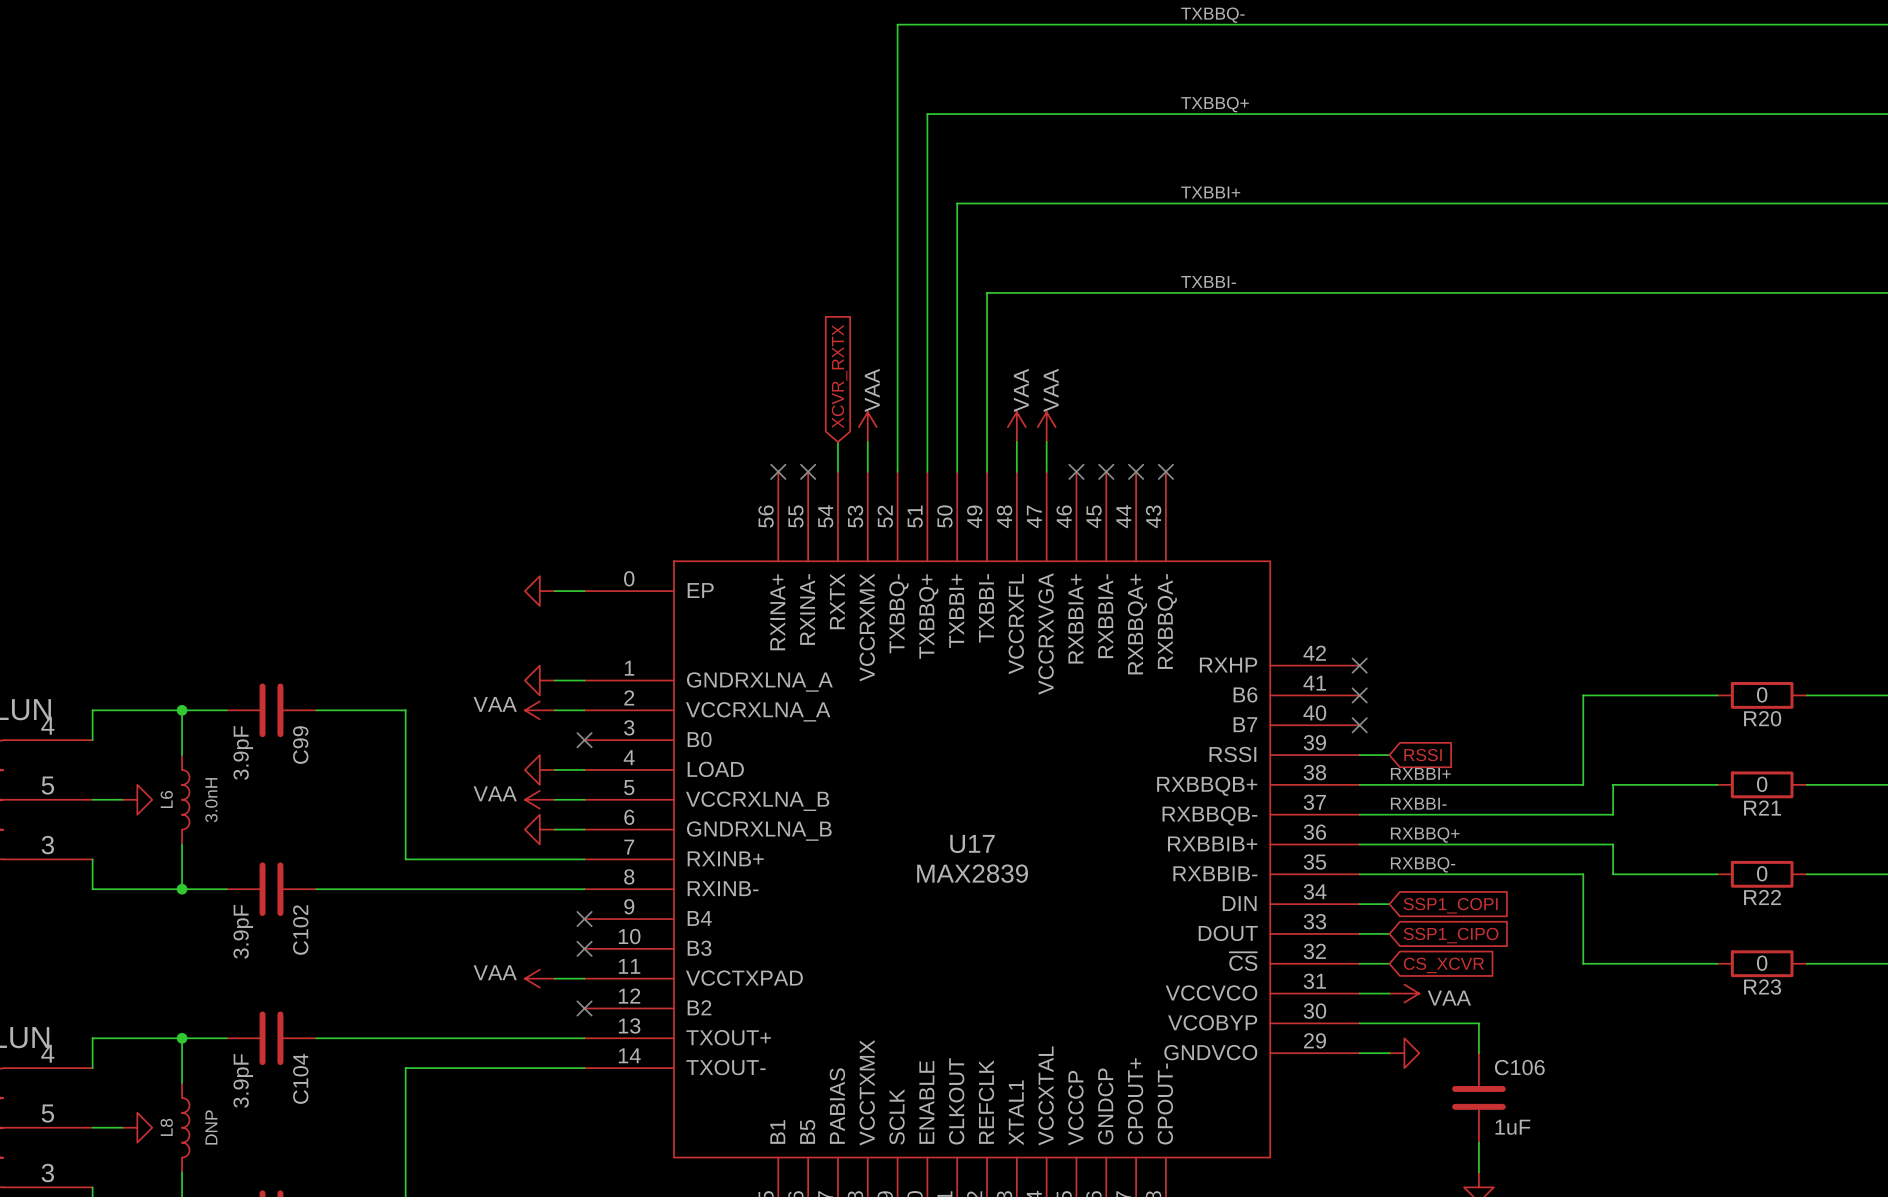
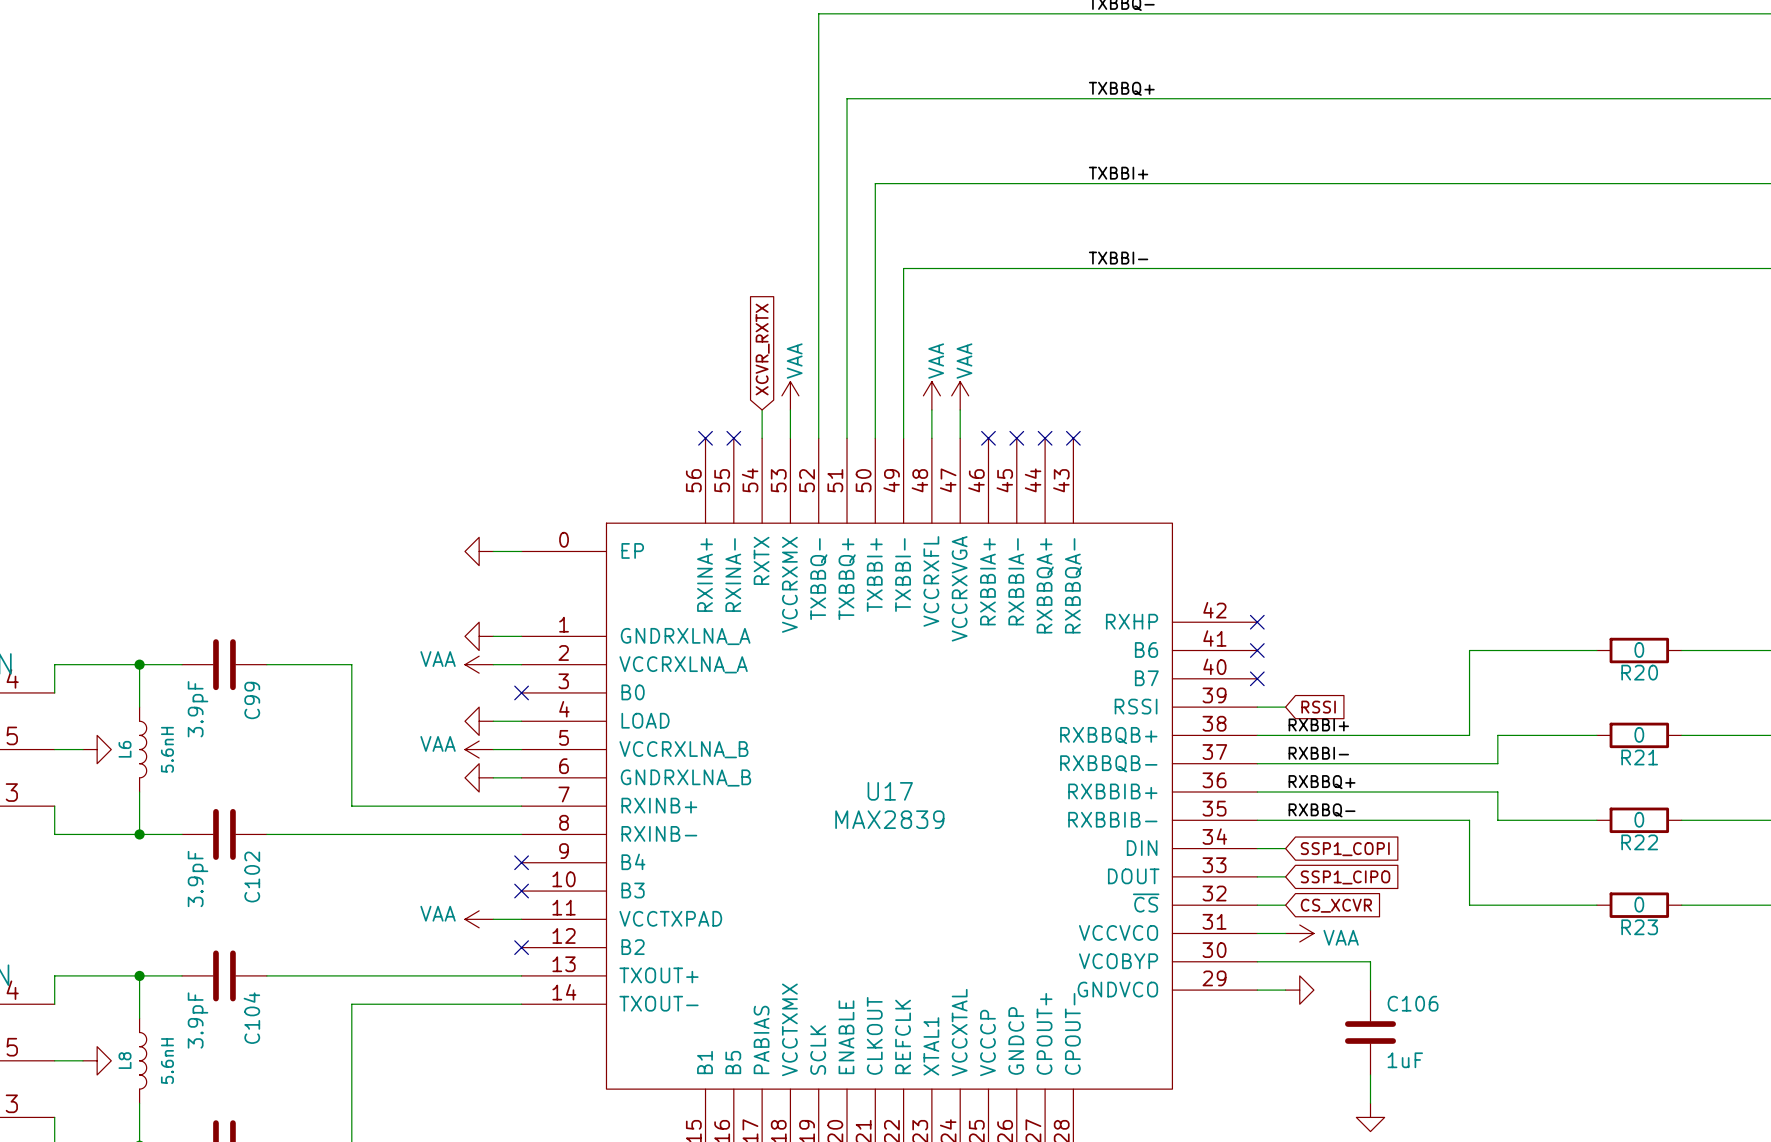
L6 value: 3.0nH (211, 800) -> 5.6nH (167, 749)
L8 value: DNP (211, 1127) -> 5.6nH (167, 1061)

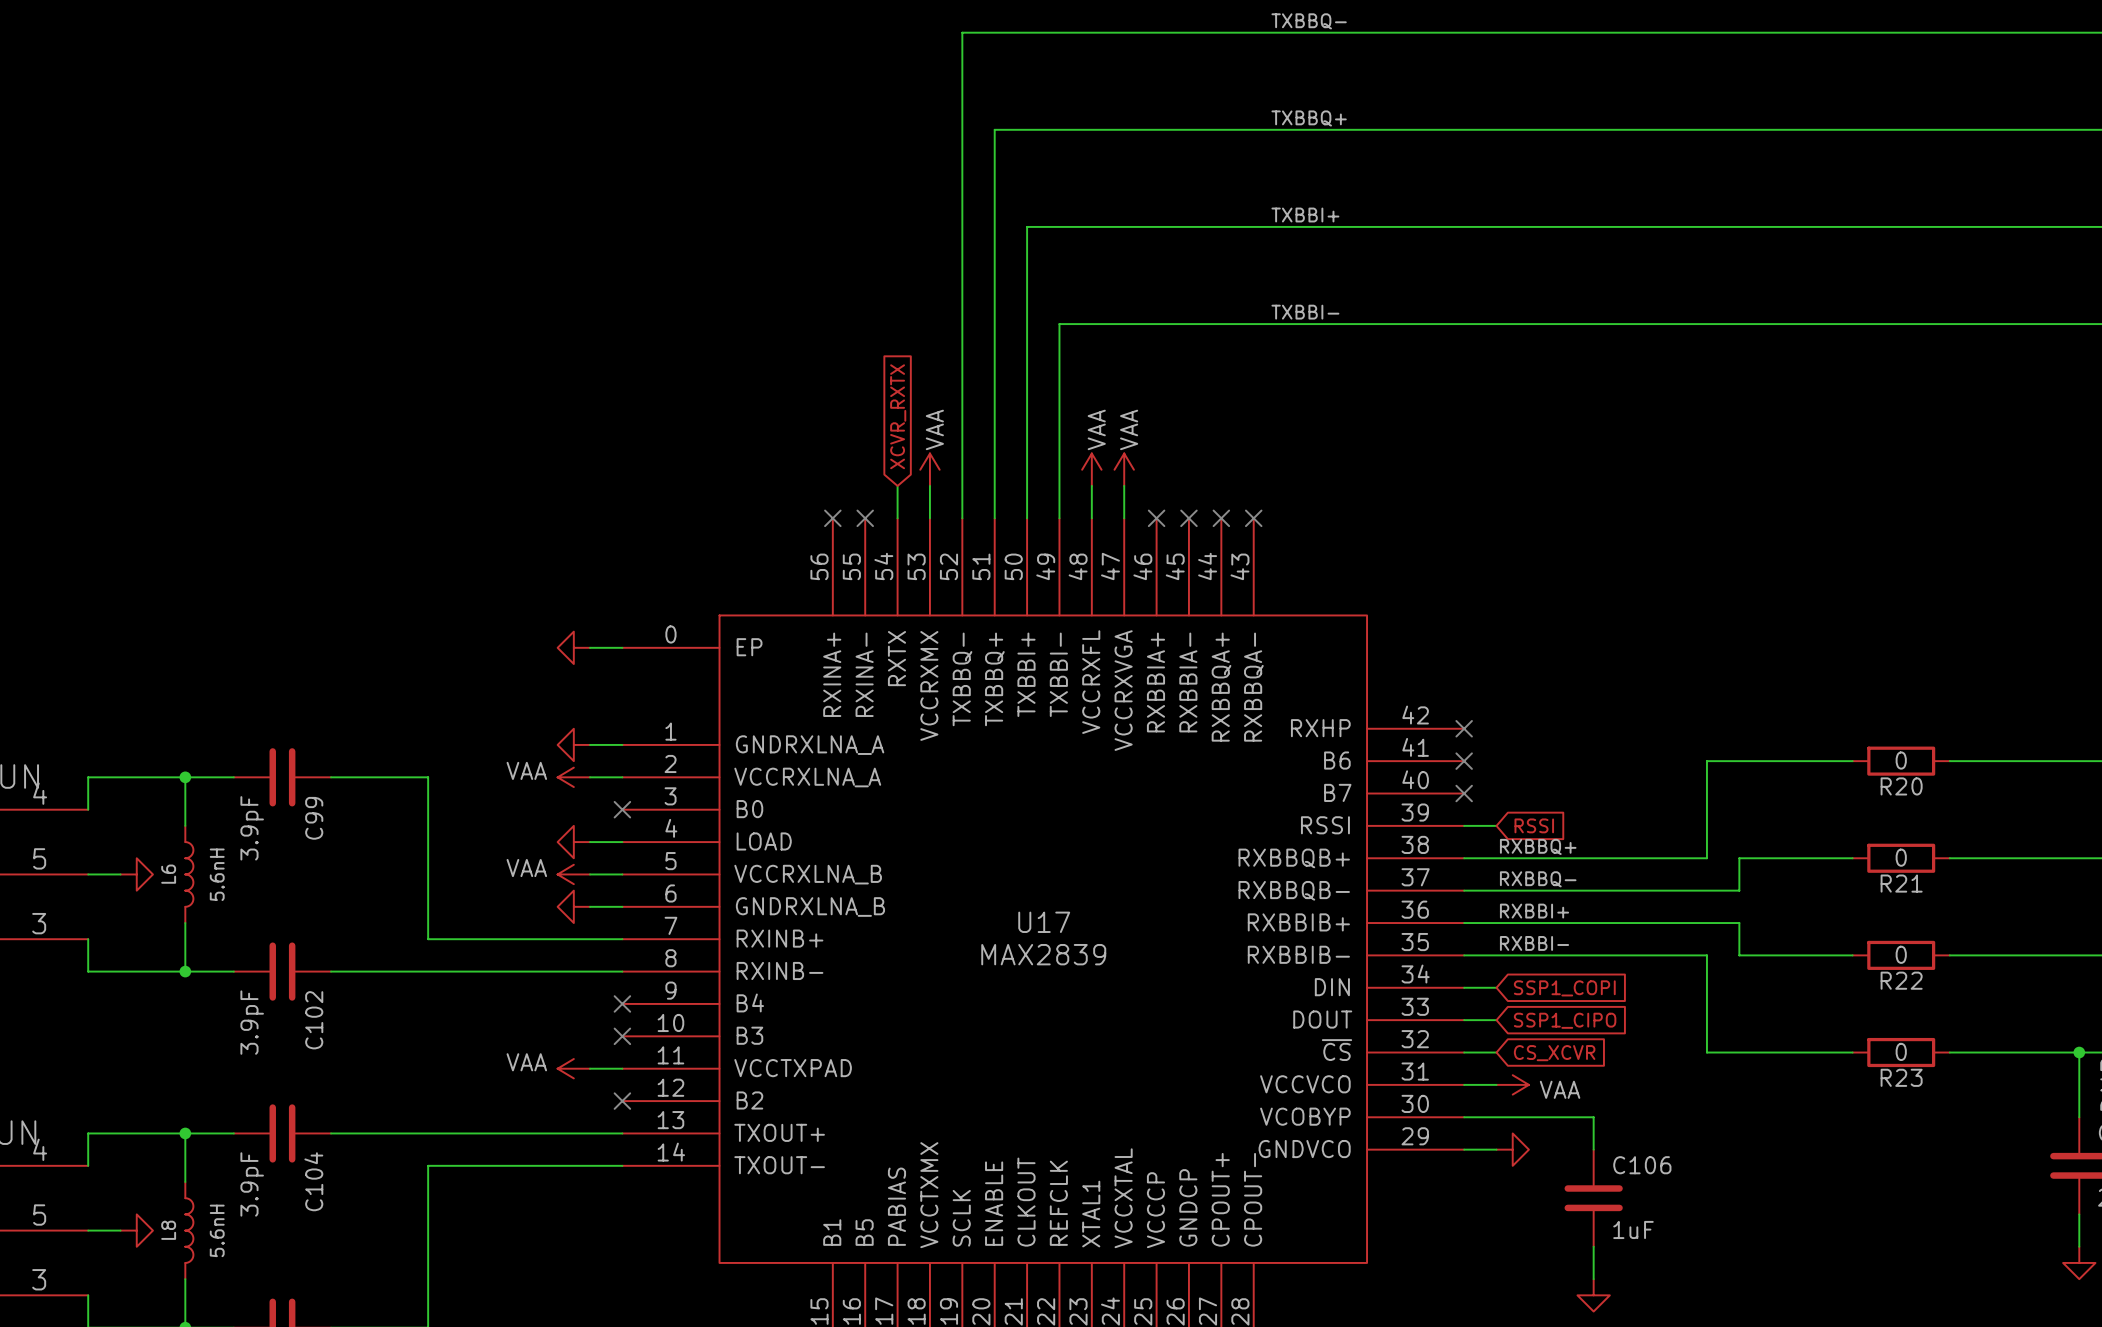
label: RXBBI+ (1318, 724) -> RXBBQ+ (1538, 846)
label: RXBBI- (1318, 753) -> RXBBQ- (1538, 879)
label: RXBBQ+ (1322, 782) -> RXBBI+ (1534, 911)
label: RXBBQ- (1322, 810) -> RXBBI- (1534, 943)

